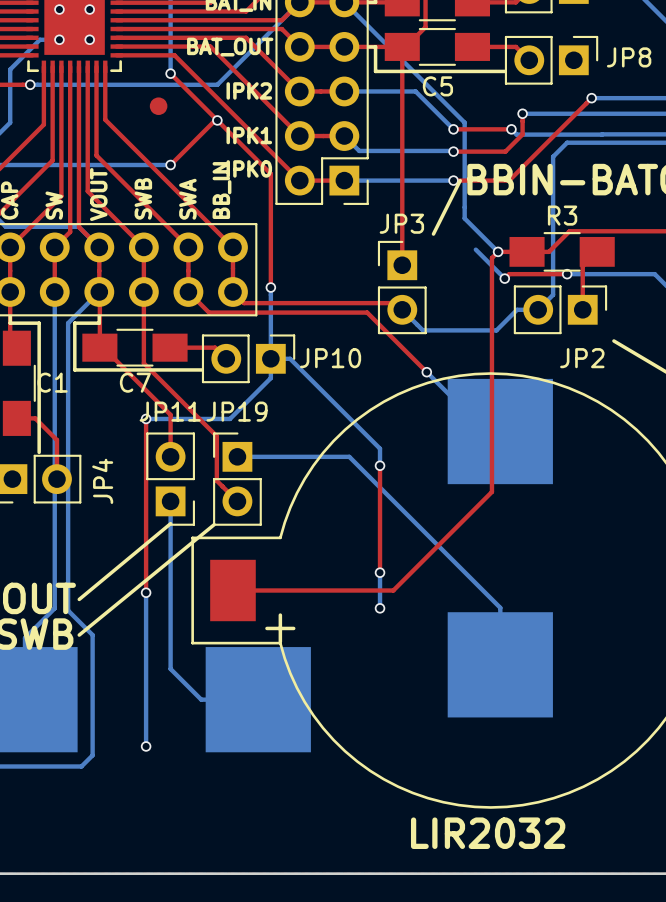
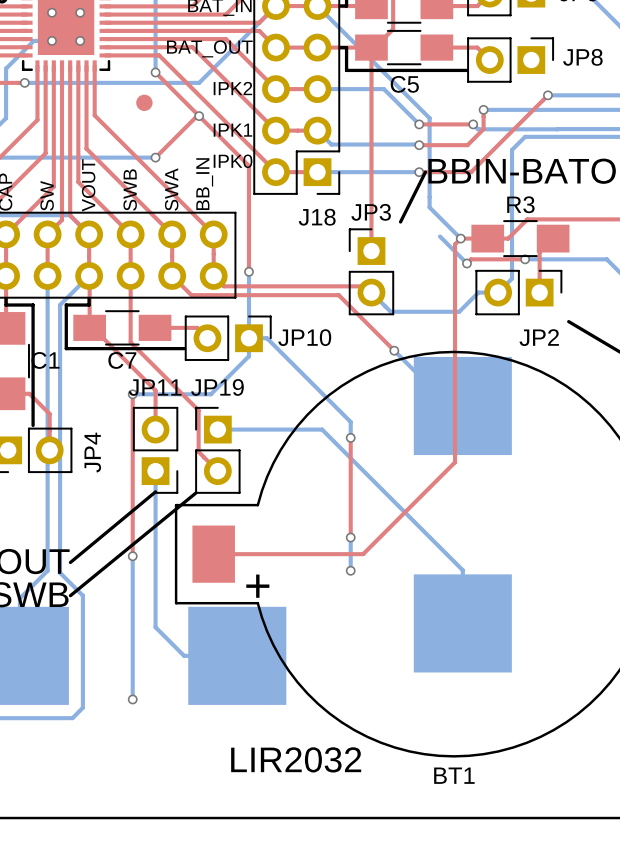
J18 name: none -> J18 (317, 217)
BT1 name: none -> BT1 (454, 775)
text position: LIR2032 (488, 833) -> LIR2032 (296, 759)

